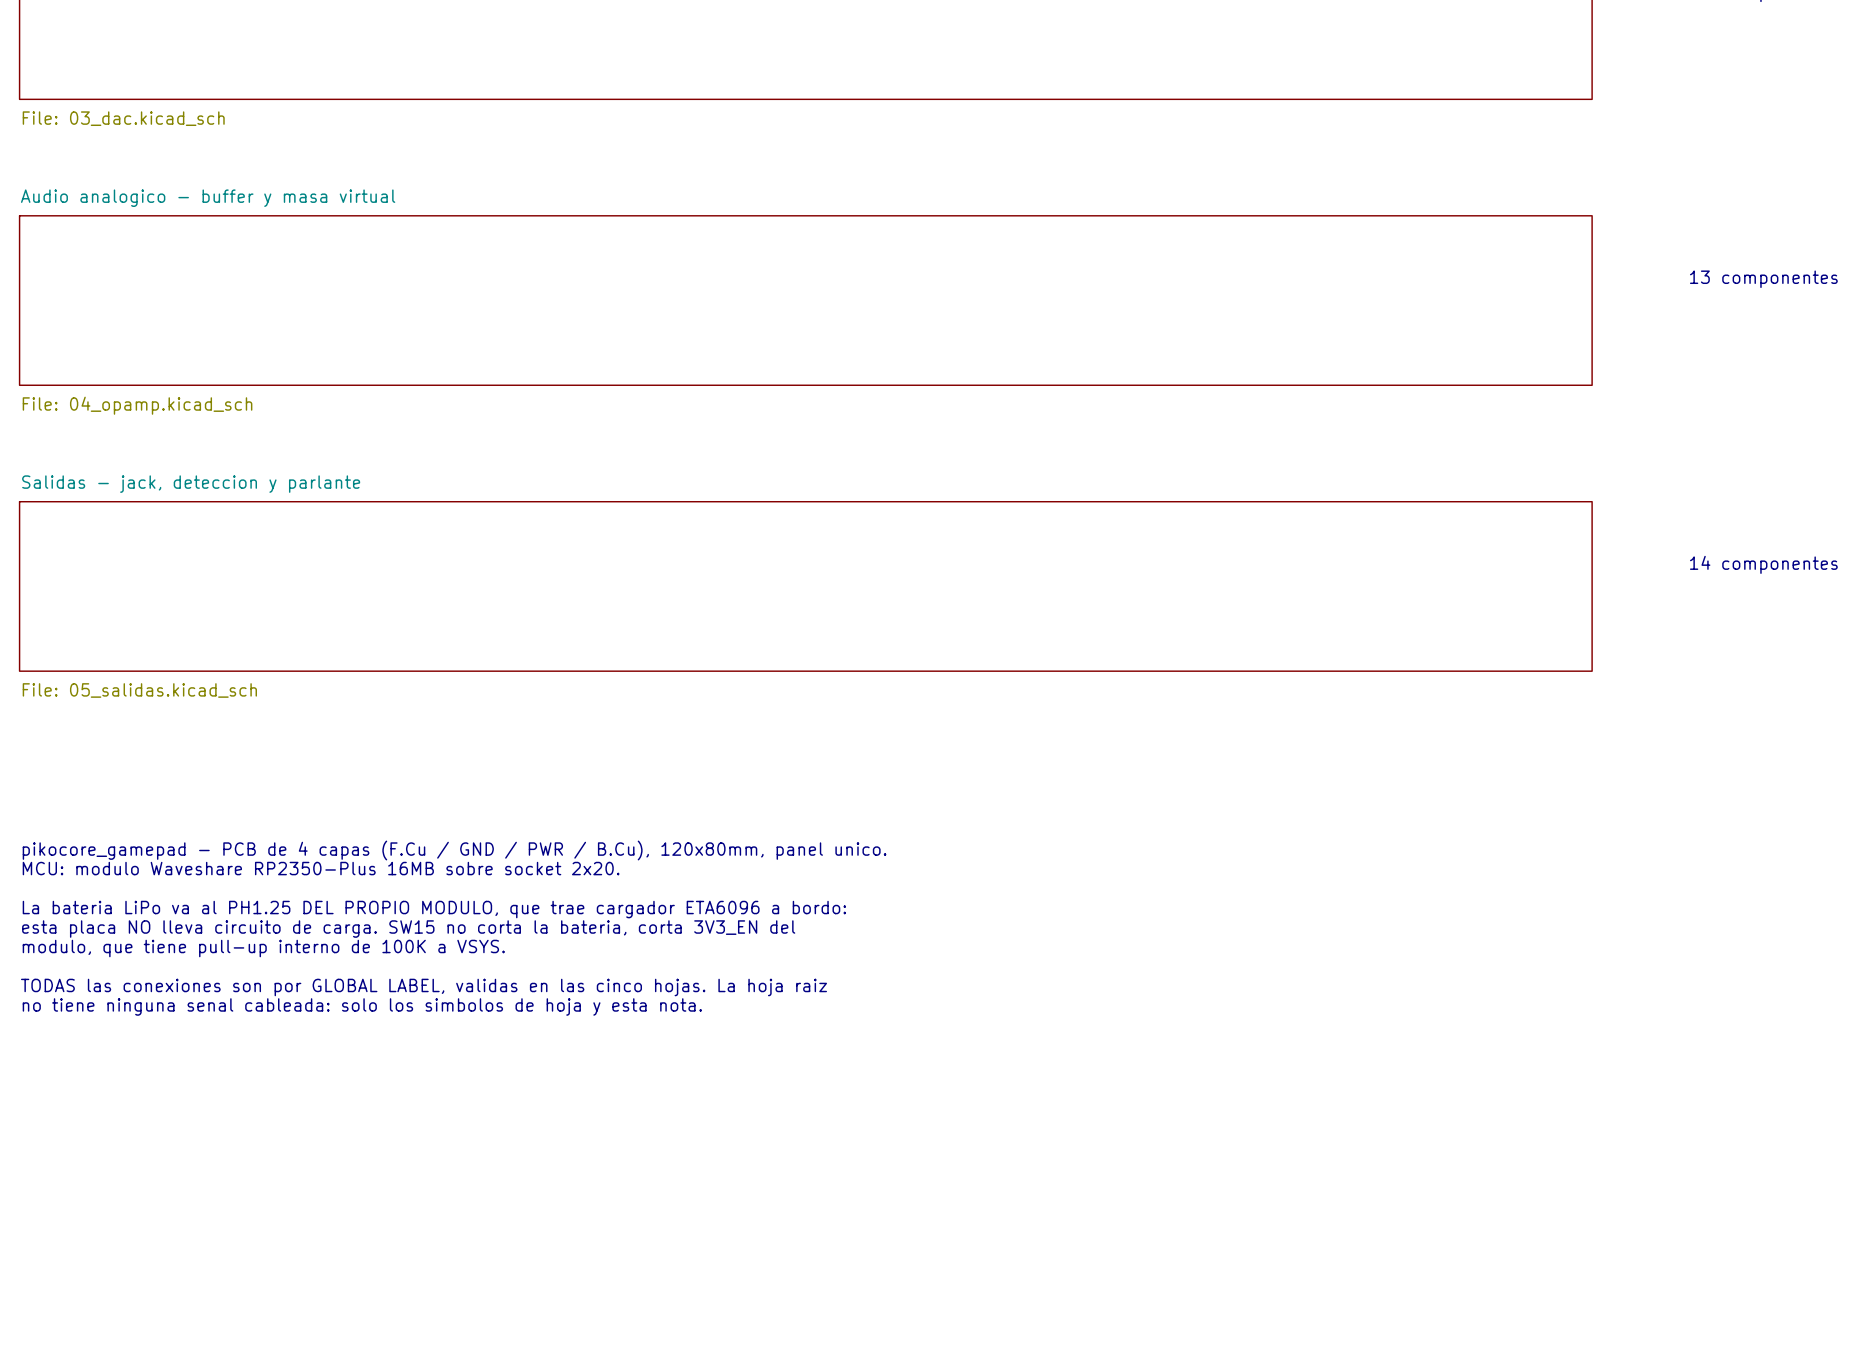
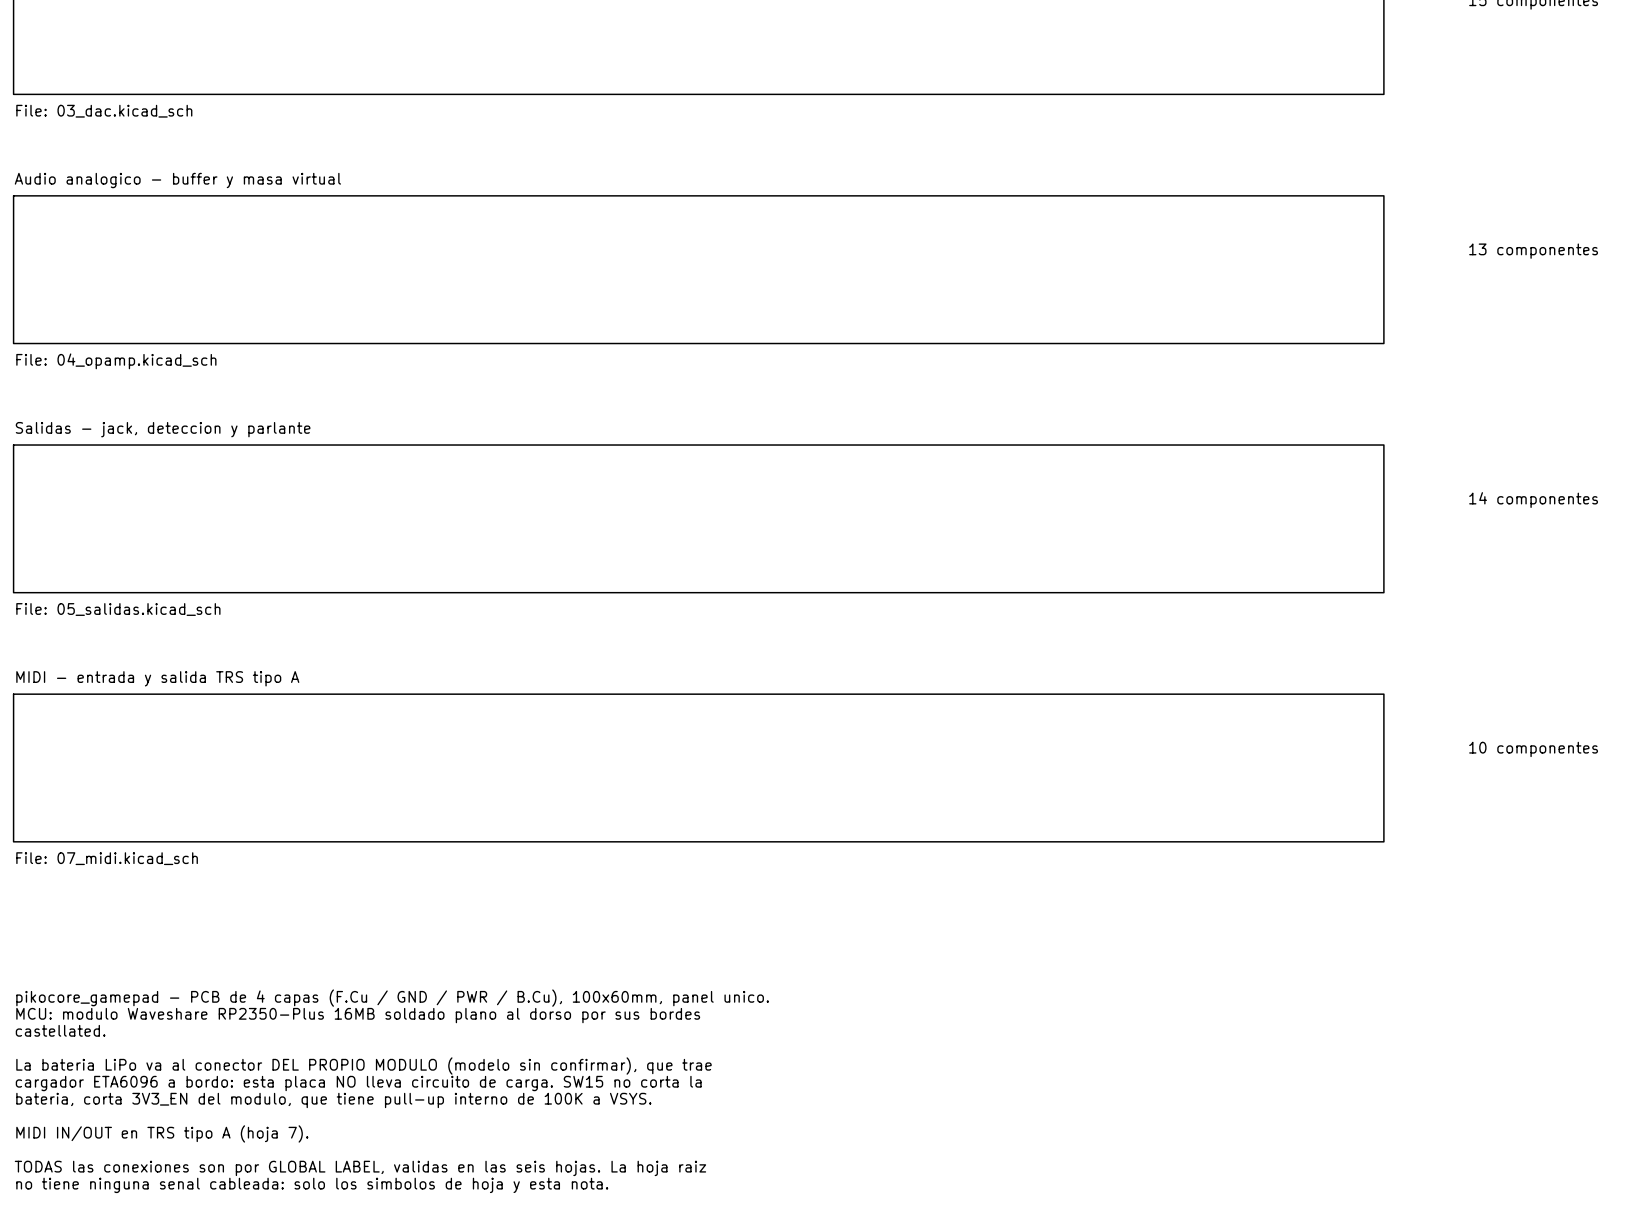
text: pikocore_gamepad - PCB de 4 capas (F.Cu / GND / PWR / B.Cu), 120x80mm, panel unico. (454, 850) -> none
text: none -> 10 componentes (1533, 749)
text: MCU: modulo Waveshare RP2350-Plus 16MB sobre socket 2x20. (321, 868) -> none
sheet MIDI - entrada y salida TRS tipo A: none -> File: 07_midi.kicad_sch (698, 767)
text: La bateria LiPo va al PH1.25 DEL PROPIO MODULO, que trae cargador ETA6096 a bordo: (434, 909) -> none
text: esta placa NO lleva circuito de carga. SW15 no corta la bateria, corta 3V3_EN del (408, 929) -> none
text: modulo, que tiene pull-up interno de 100K a VSYS. (263, 948) -> none
text: TODAS las conexiones son por GLOBAL LABEL, validas en las cinco hojas. La hoja raiz (423, 987) -> none
text: no tiene ninguna senal cableada: solo los simbolos de hoja y esta nota. (362, 1006) -> none
text: none -> pikocore_gamepad - PCB de 4 capas (F.Cu / GND / PWR / B.Cu), 100x60mm, panel unico. (392, 998)
text: none -> MCU: modulo Waveshare RP2350-Plus 16MB soldado plano al dorso por sus bordes (358, 1015)
text: none -> castellated. (60, 1030)
text: none -> La bateria LiPo va al conector DEL PROPIO MODULO (modelo sin confirmar), que trae (363, 1066)
text: none -> cargador ETA6096 a bordo: esta placa NO lleva circuito de carga. SW15 no corta la (358, 1083)
text: none -> bateria, corta 3V3_EN del modulo, que tiene pull-up interno de 100K a VSYS. (333, 1100)
text: none -> MIDI IN/OUT en TRS tipo A (hoja 7). (162, 1133)
text: none -> TODAS las conexiones son por GLOBAL LABEL, validas en las seis hojas. La hoja raiz (360, 1168)
text: none -> no tiene ninguna senal cableada: solo los simbolos de hoja y esta nota. (312, 1185)

